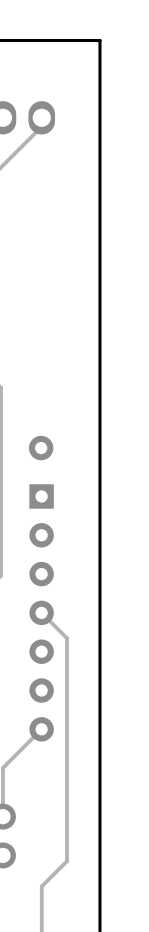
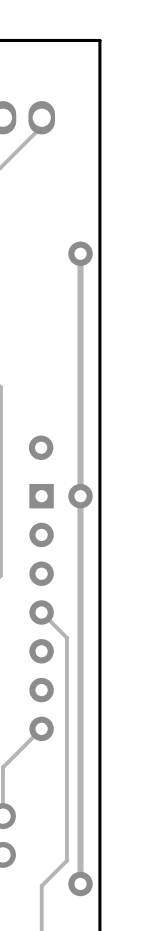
track: none -> (80, 253) (80, 883)
via: none -> (80, 253)
via: none -> (80, 496)
via: none -> (80, 883)

